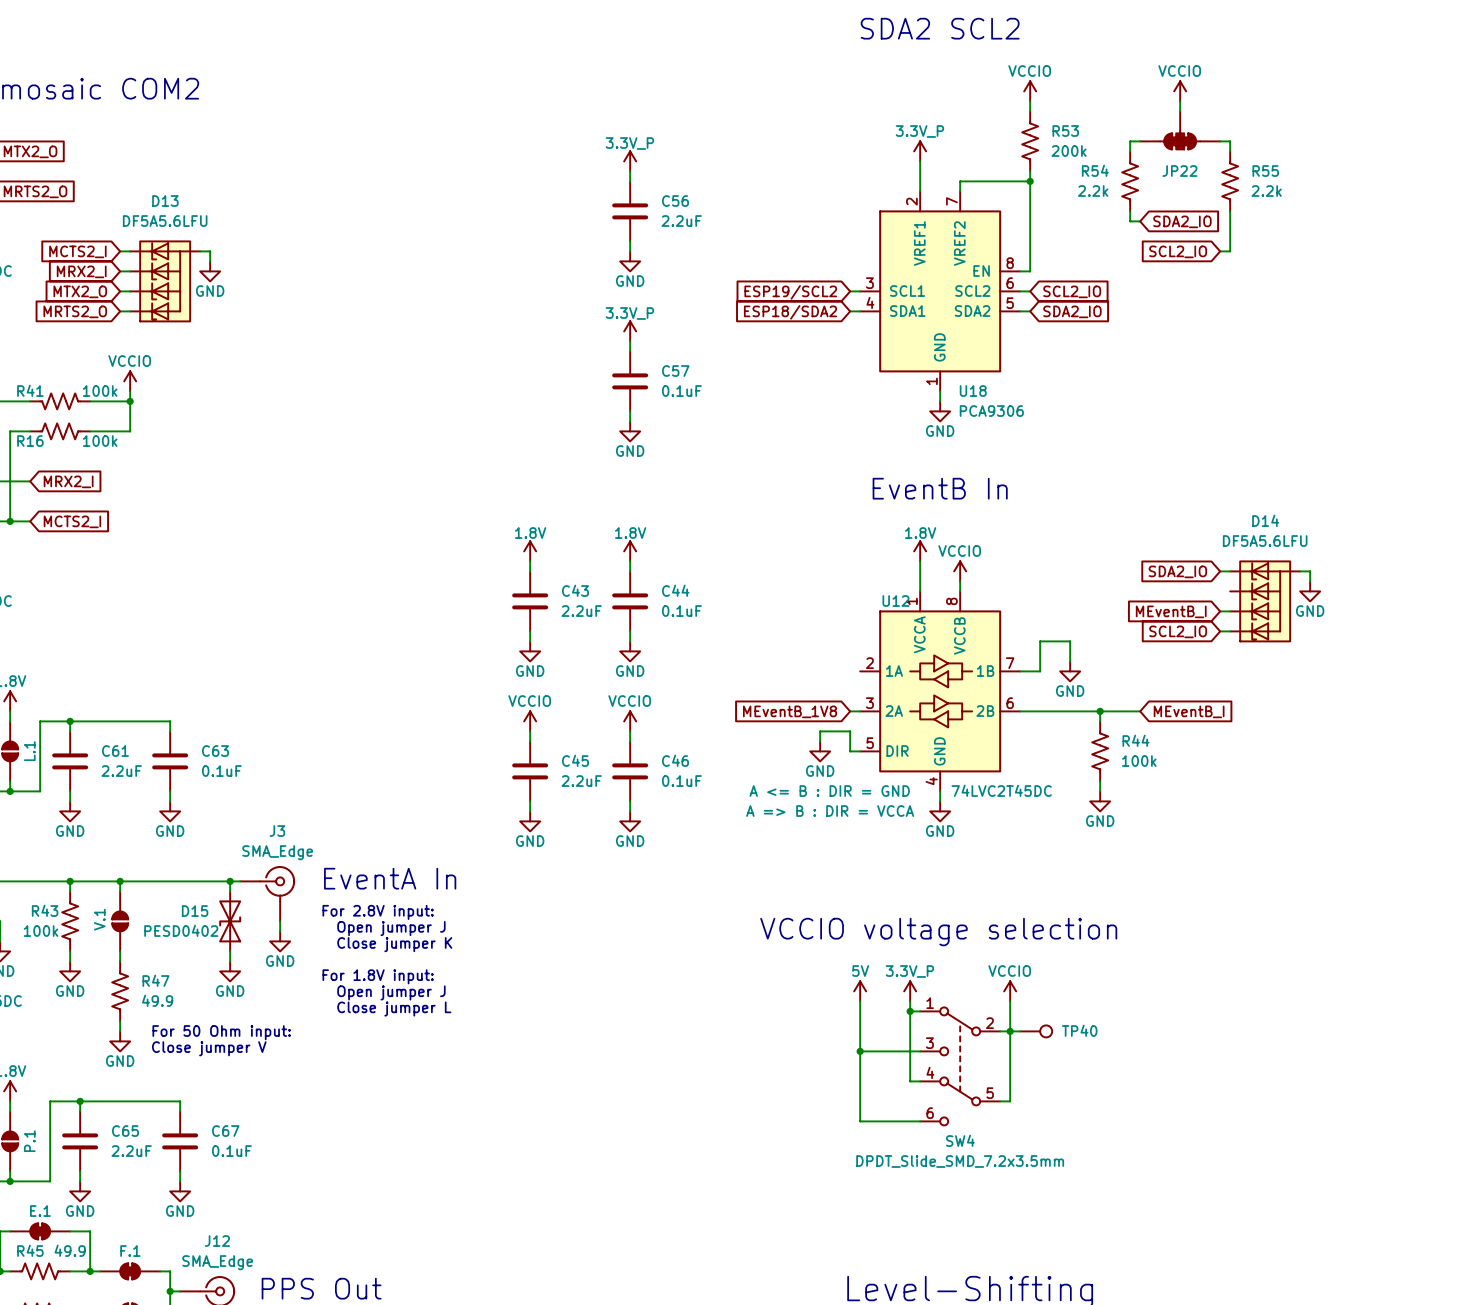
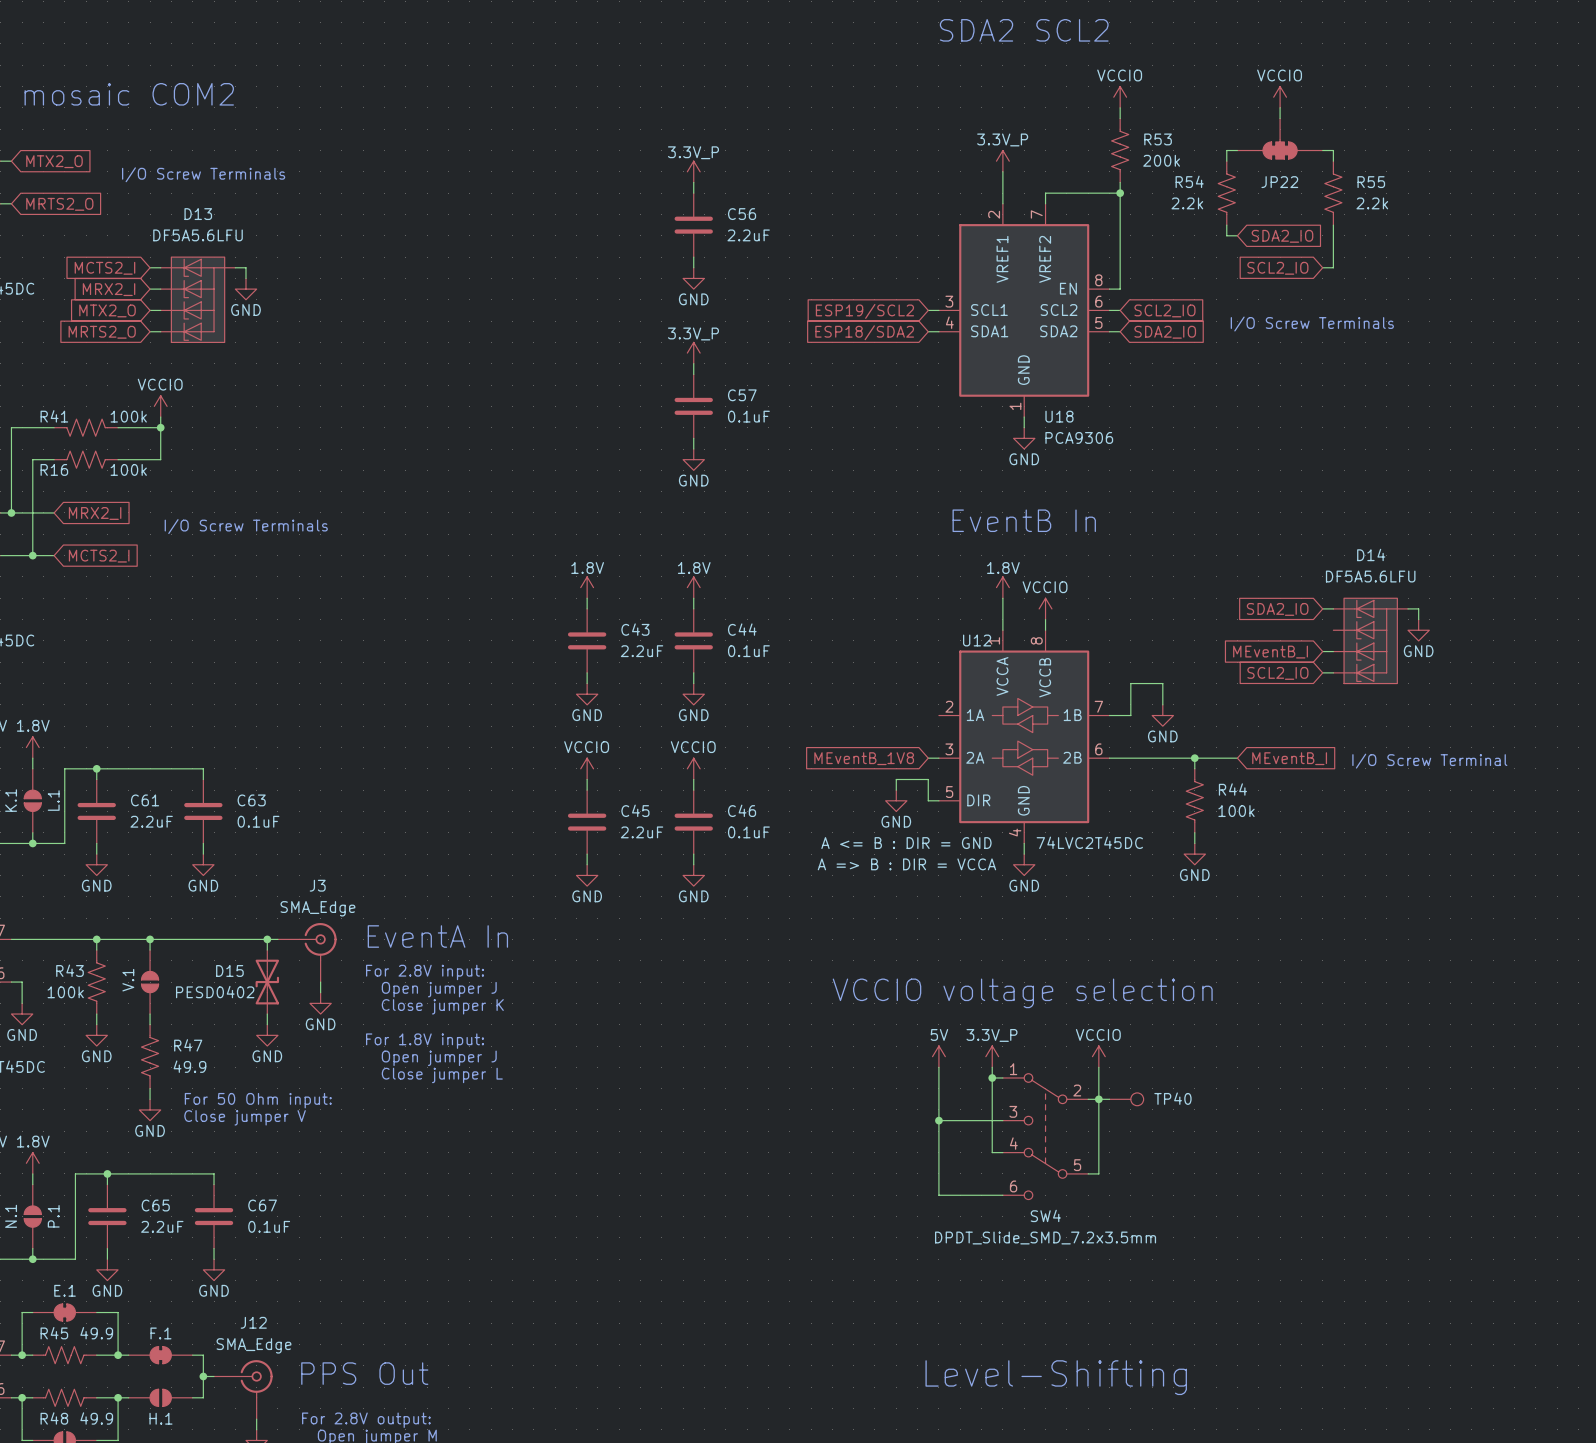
text: none -> I/O Screw Terminals (203, 174)
text: none -> I/O Screw Terminals (1312, 324)
text: none -> I/O Screw Terminals (246, 526)
text: none -> I/O Screw Terminal (1429, 761)

